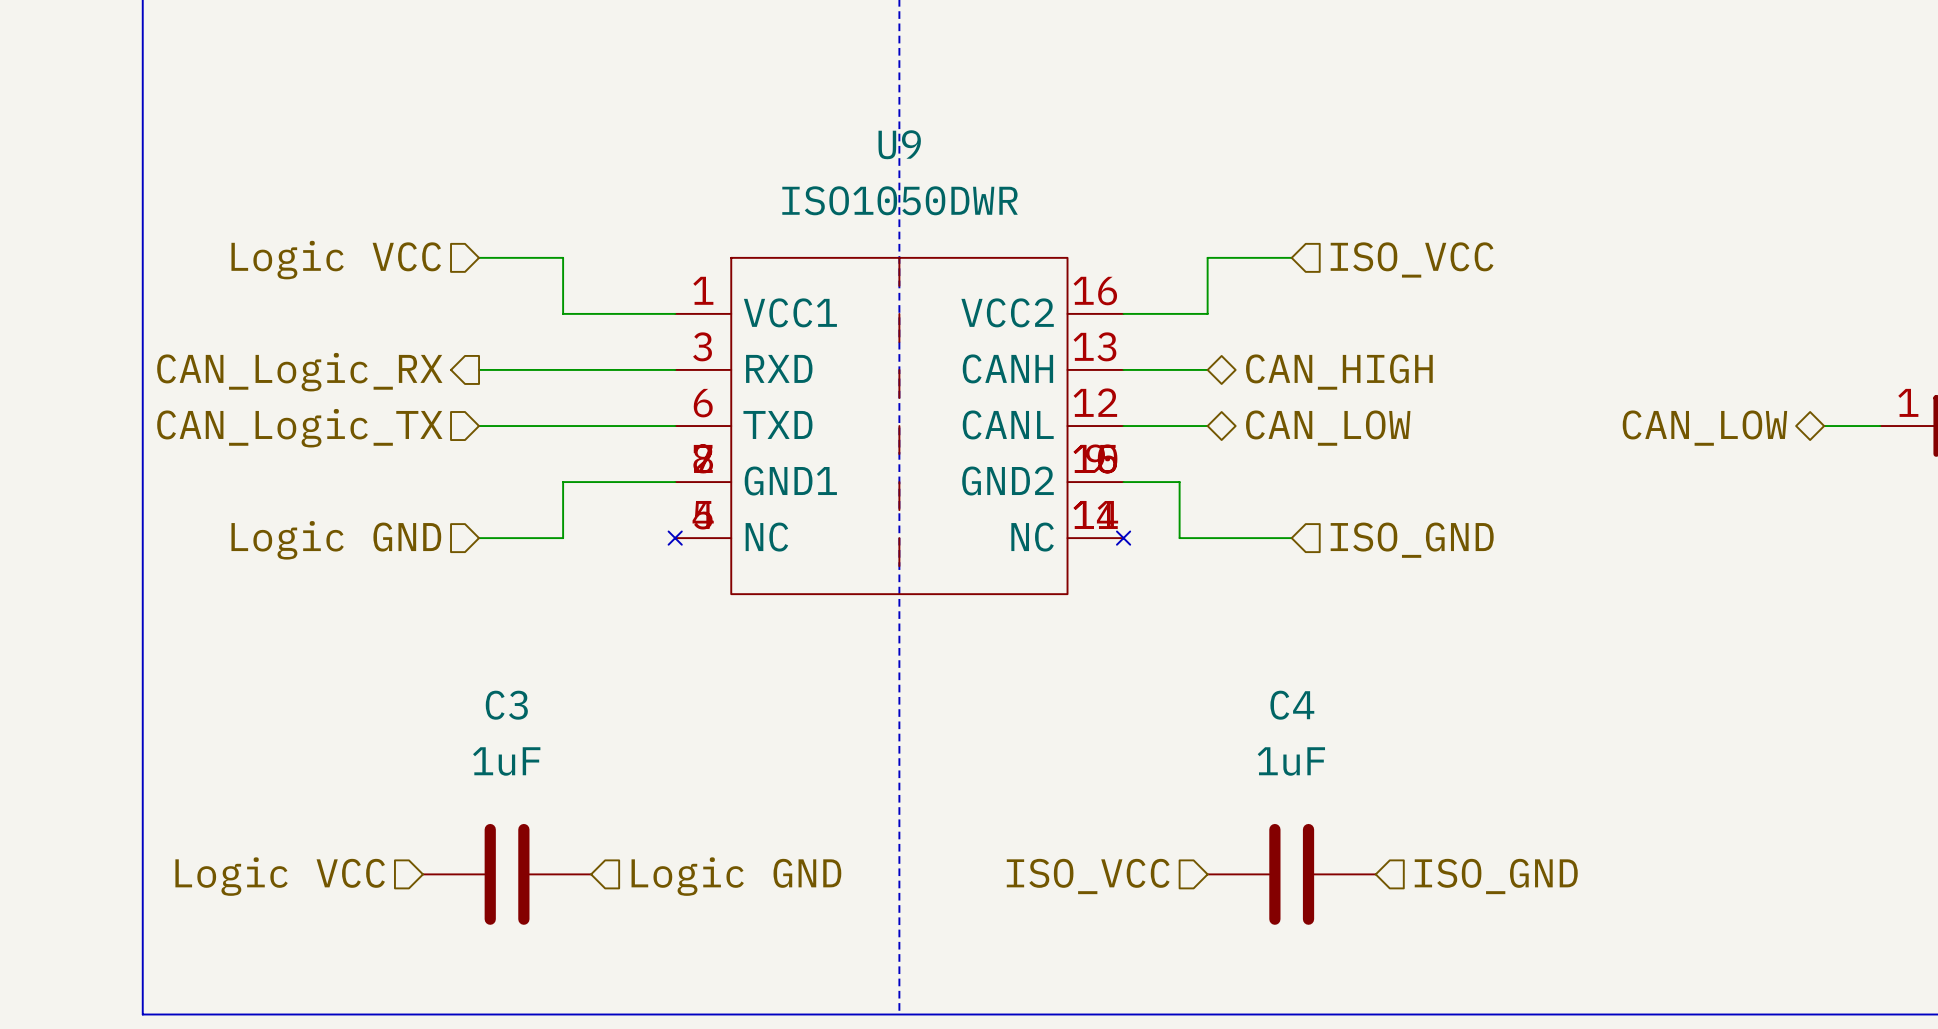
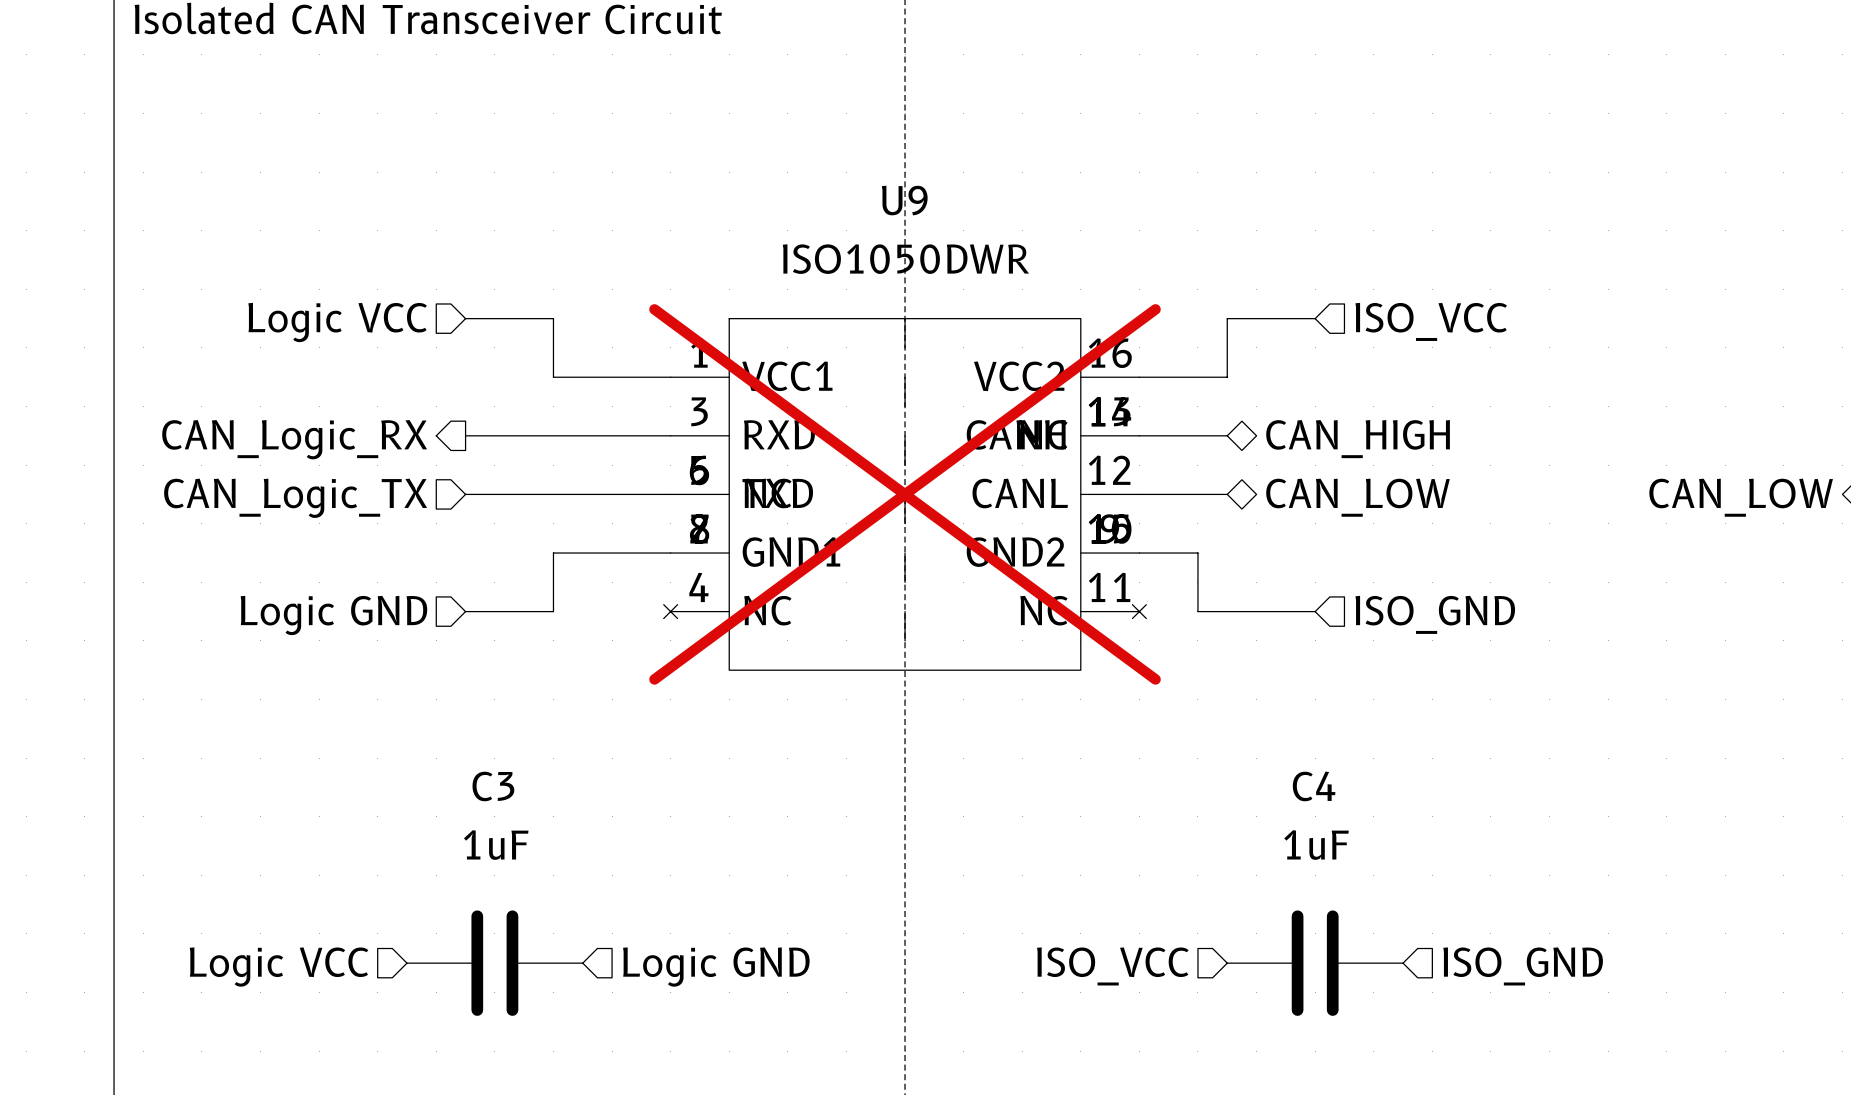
U9 symbol: [668, 257, 1131, 595] -> [663, 318, 1147, 671]
U9 do-not-place cross: none -> (905, 494)

